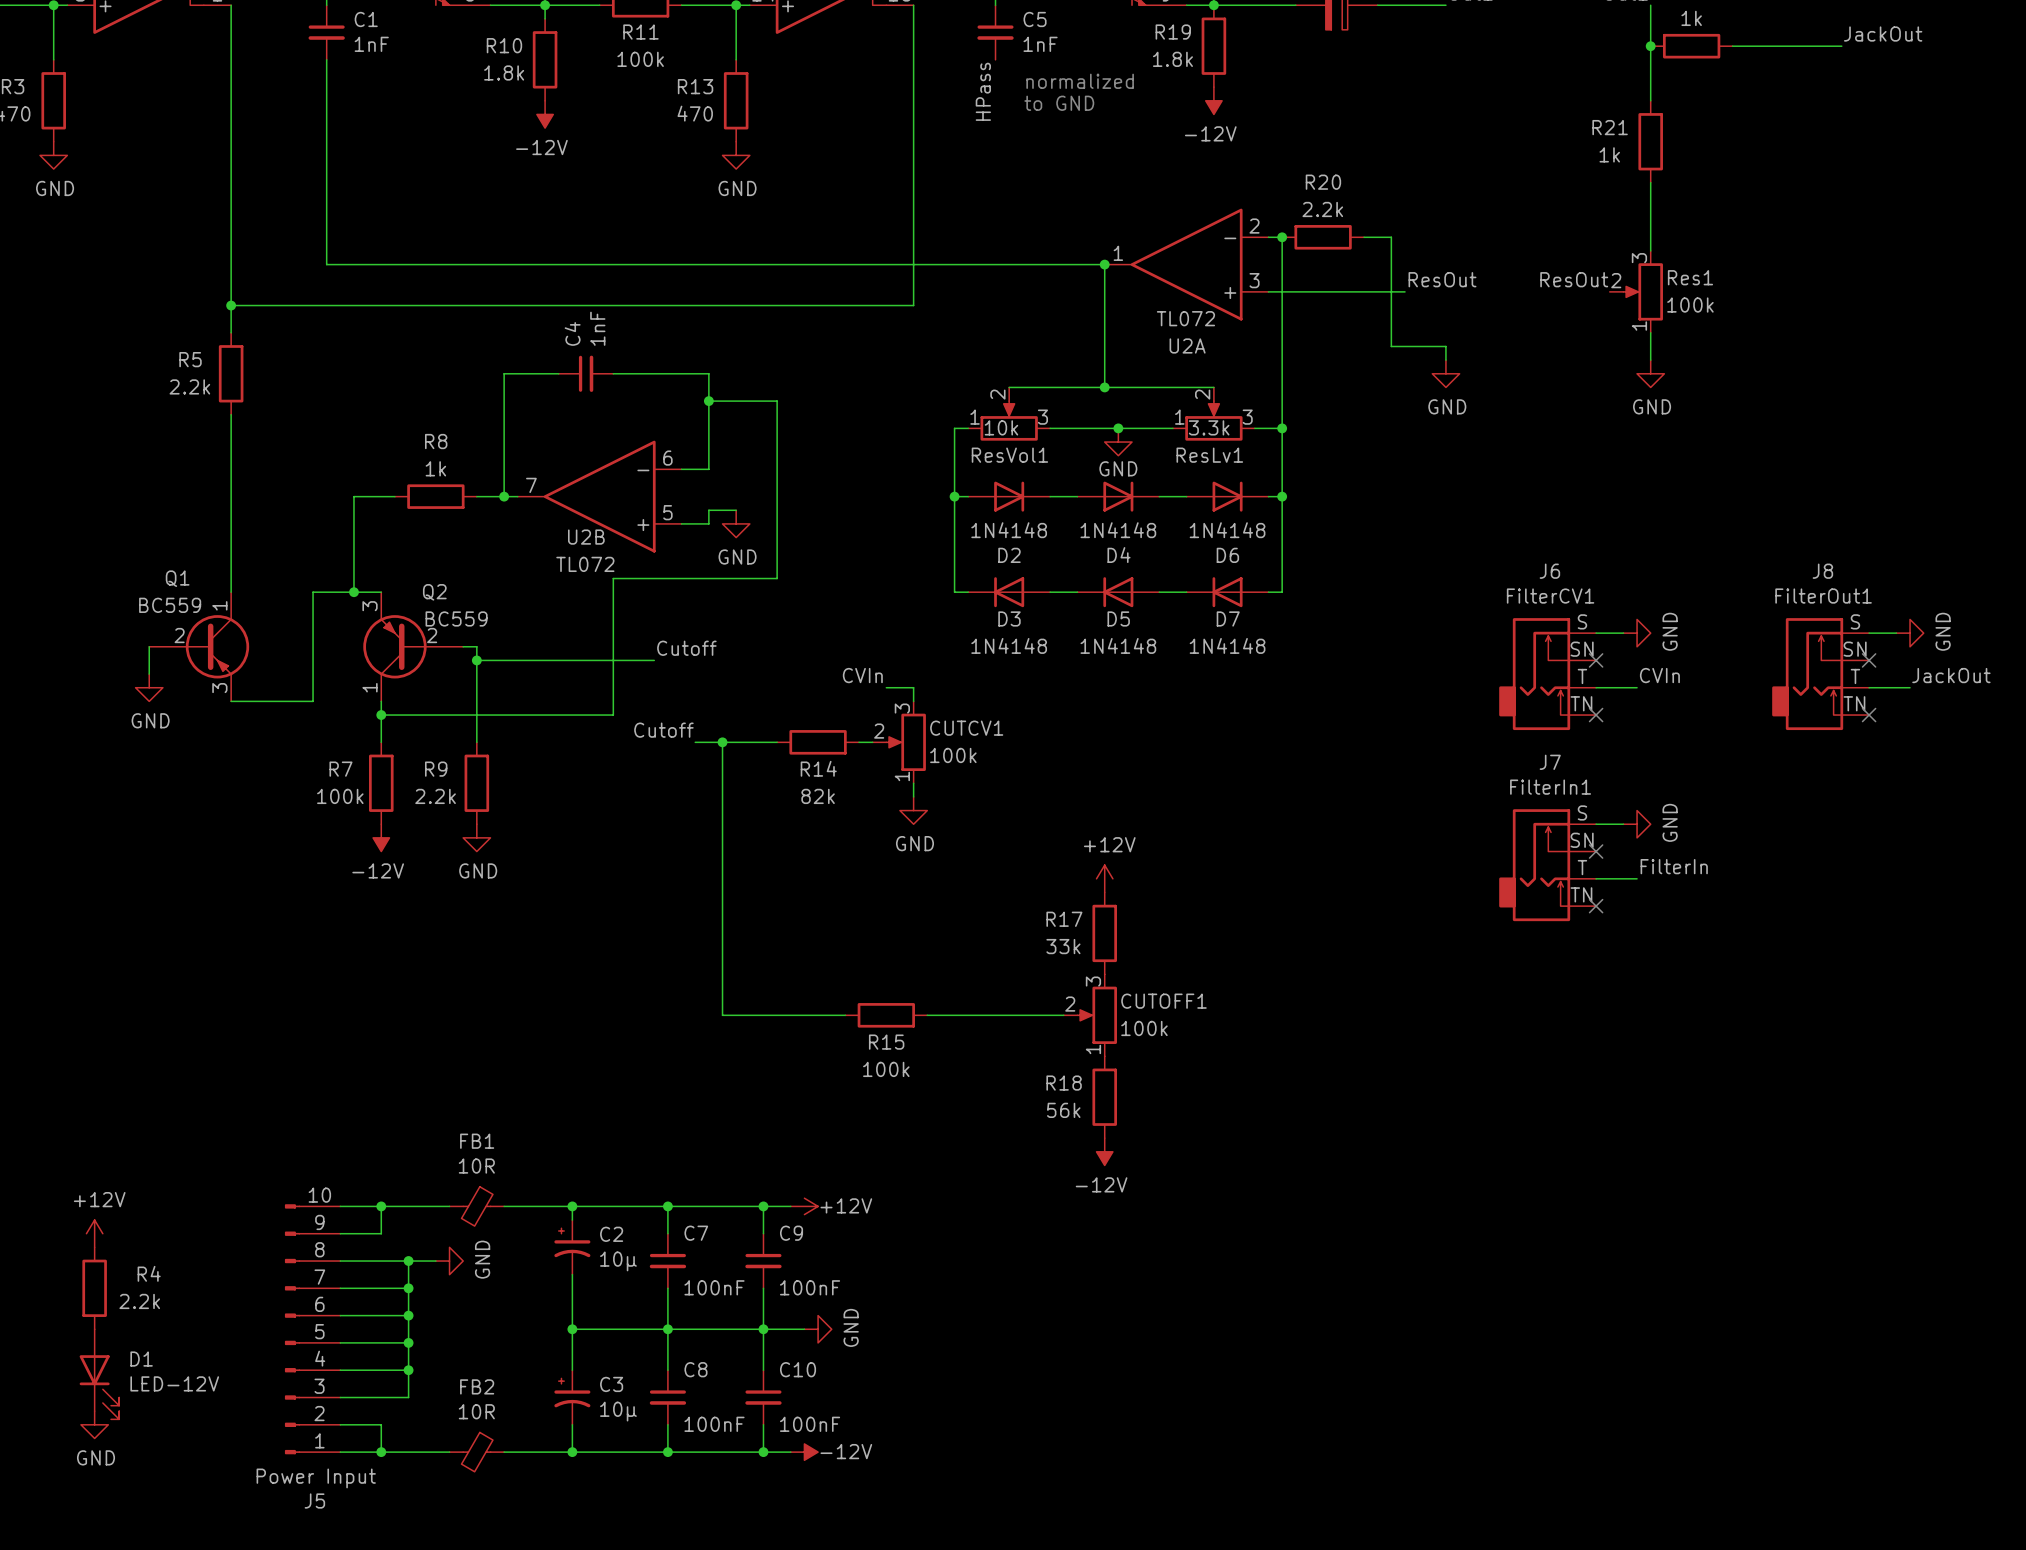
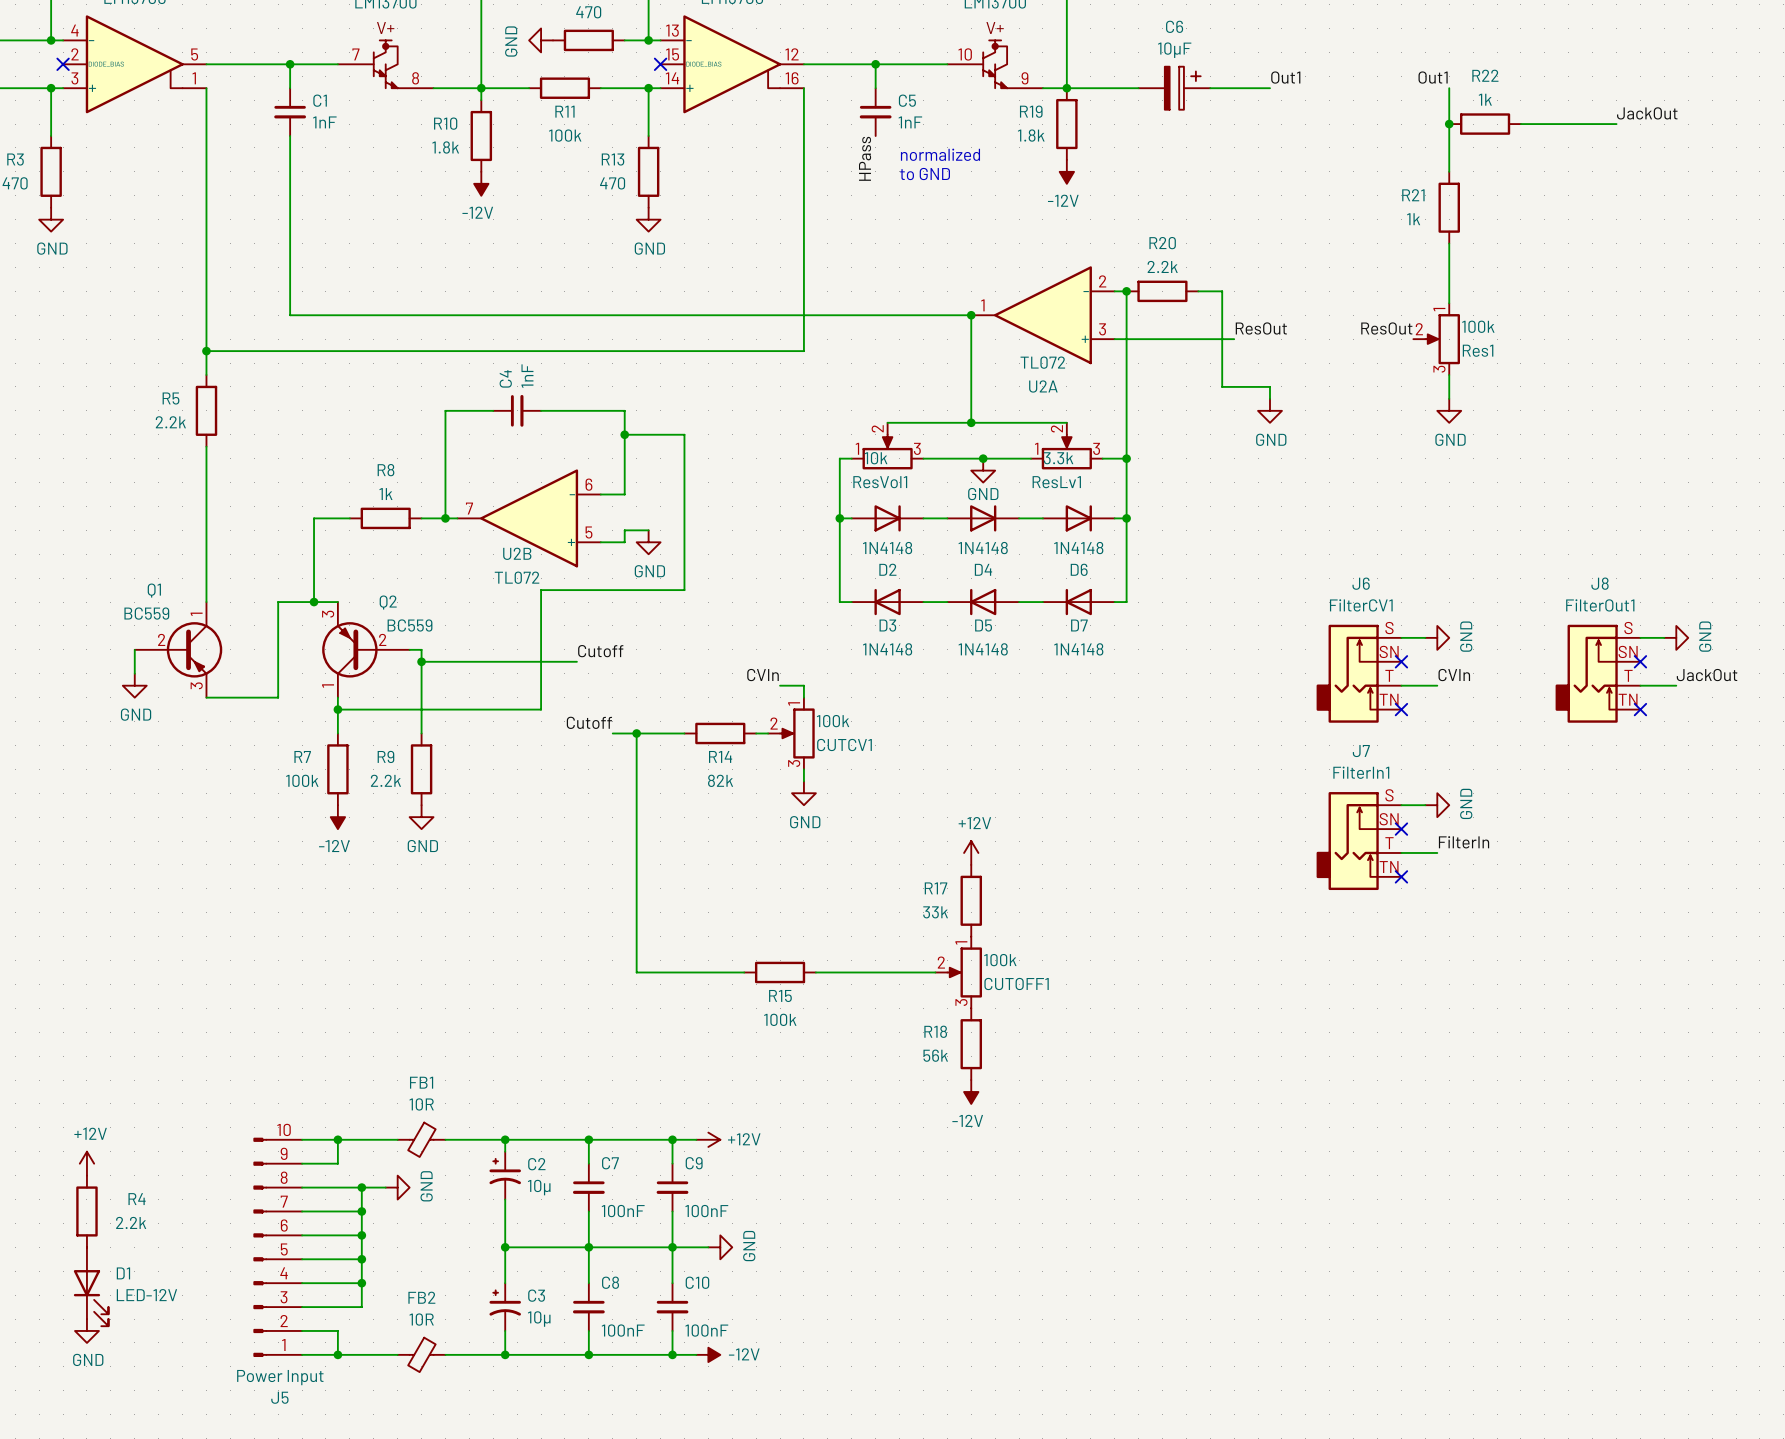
Res1 flip: as is (1643, 291) -> up-down (1442, 339)
CUTCV1 flip: as is (906, 742) -> up-down (797, 733)
CUTOFF1 flip: as is (1097, 1015) -> up-down (964, 972)

